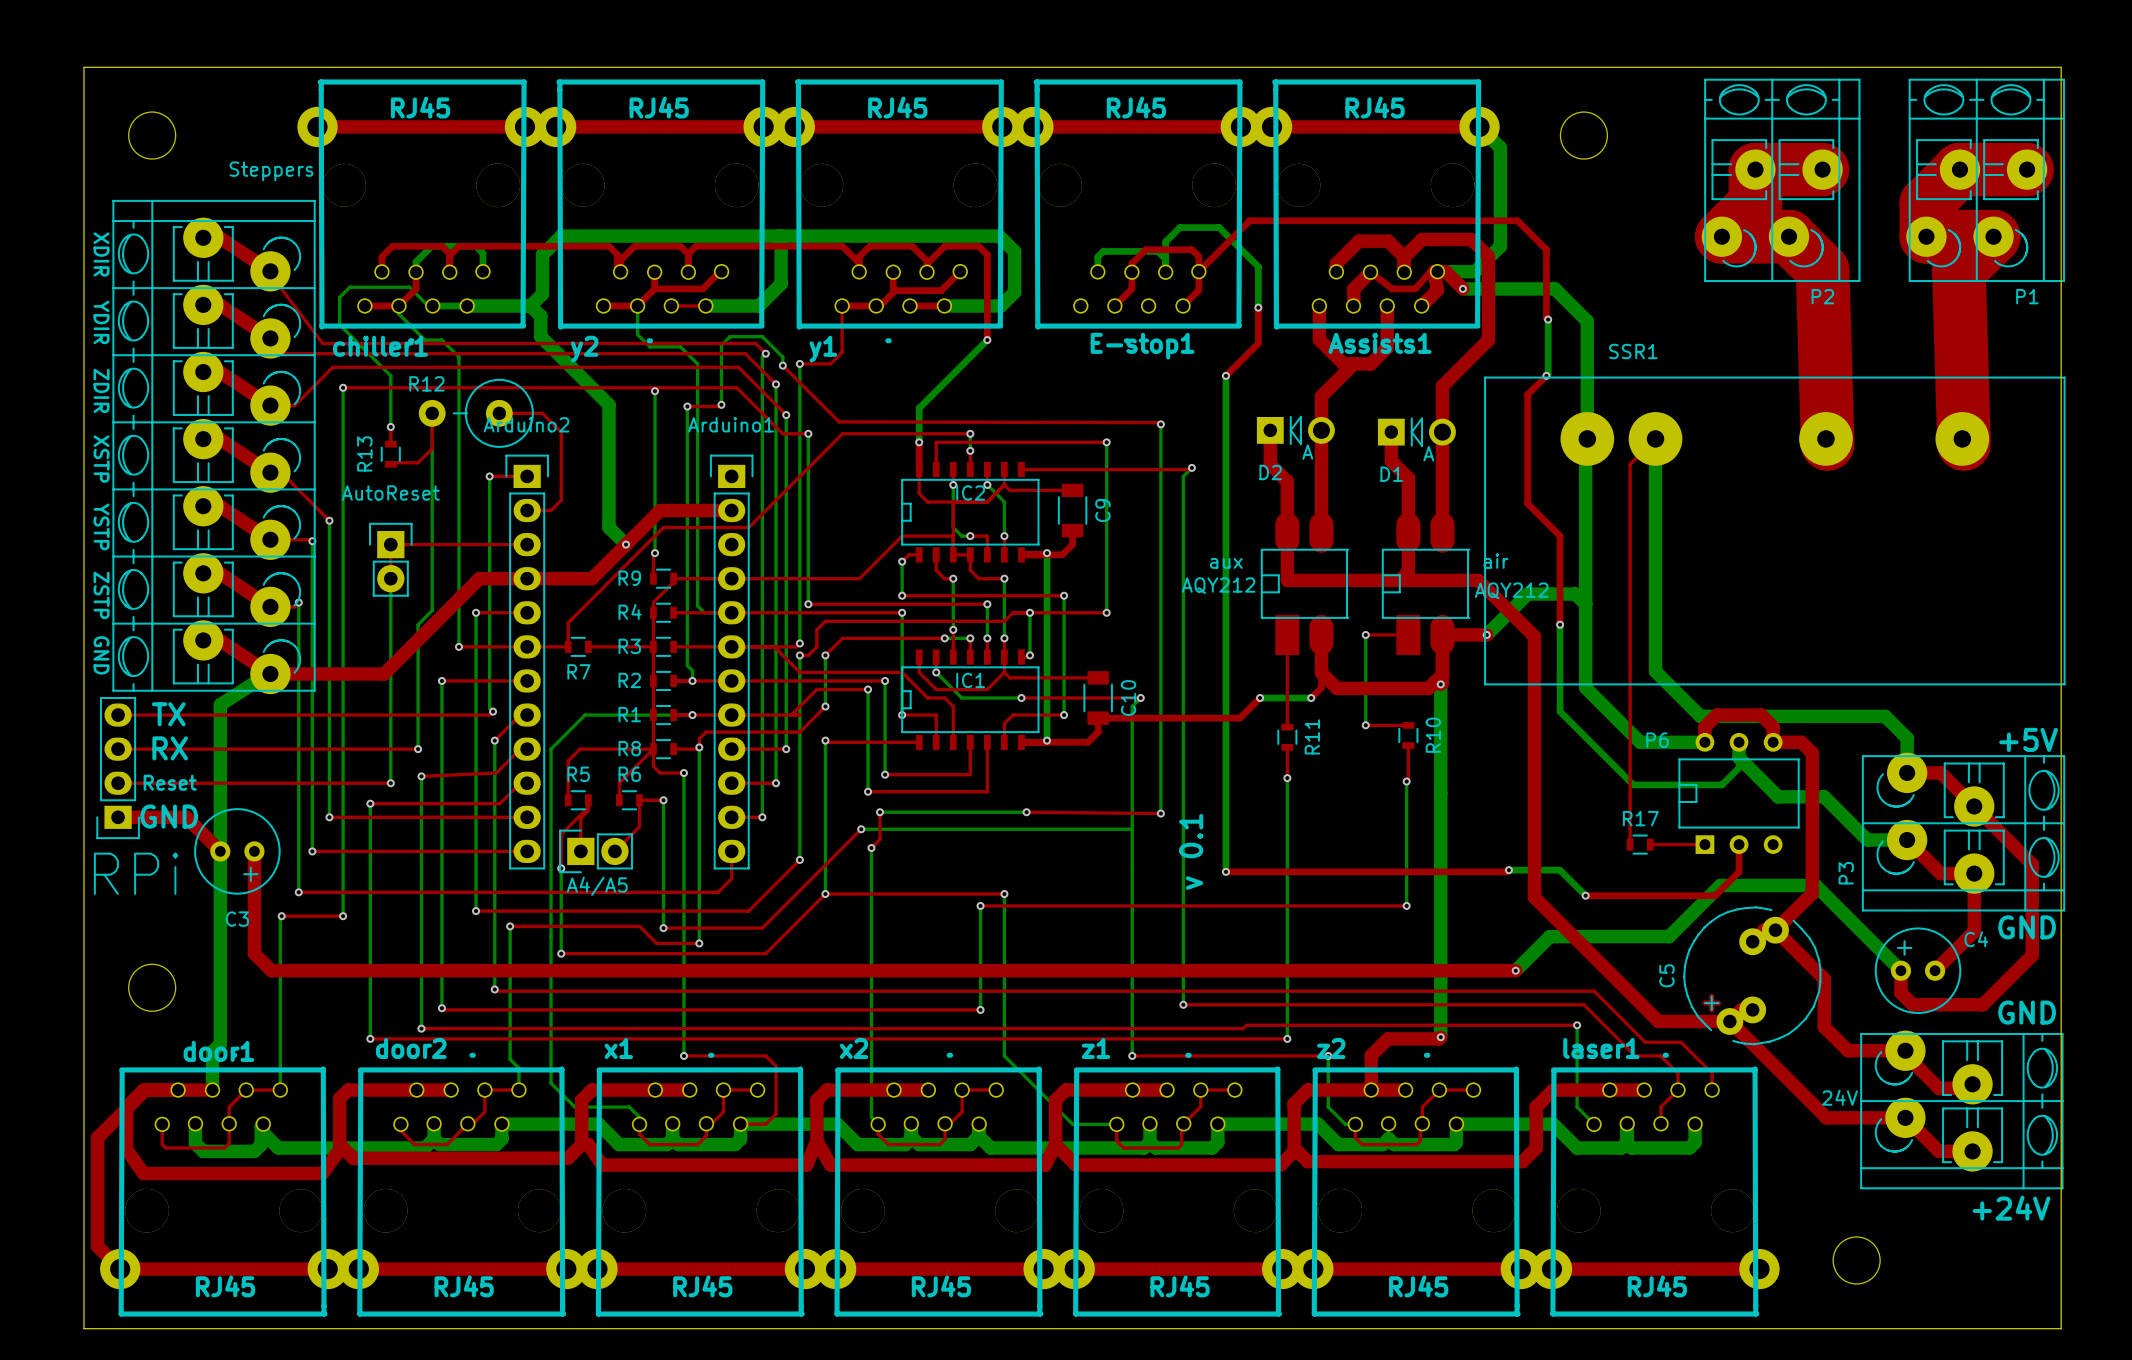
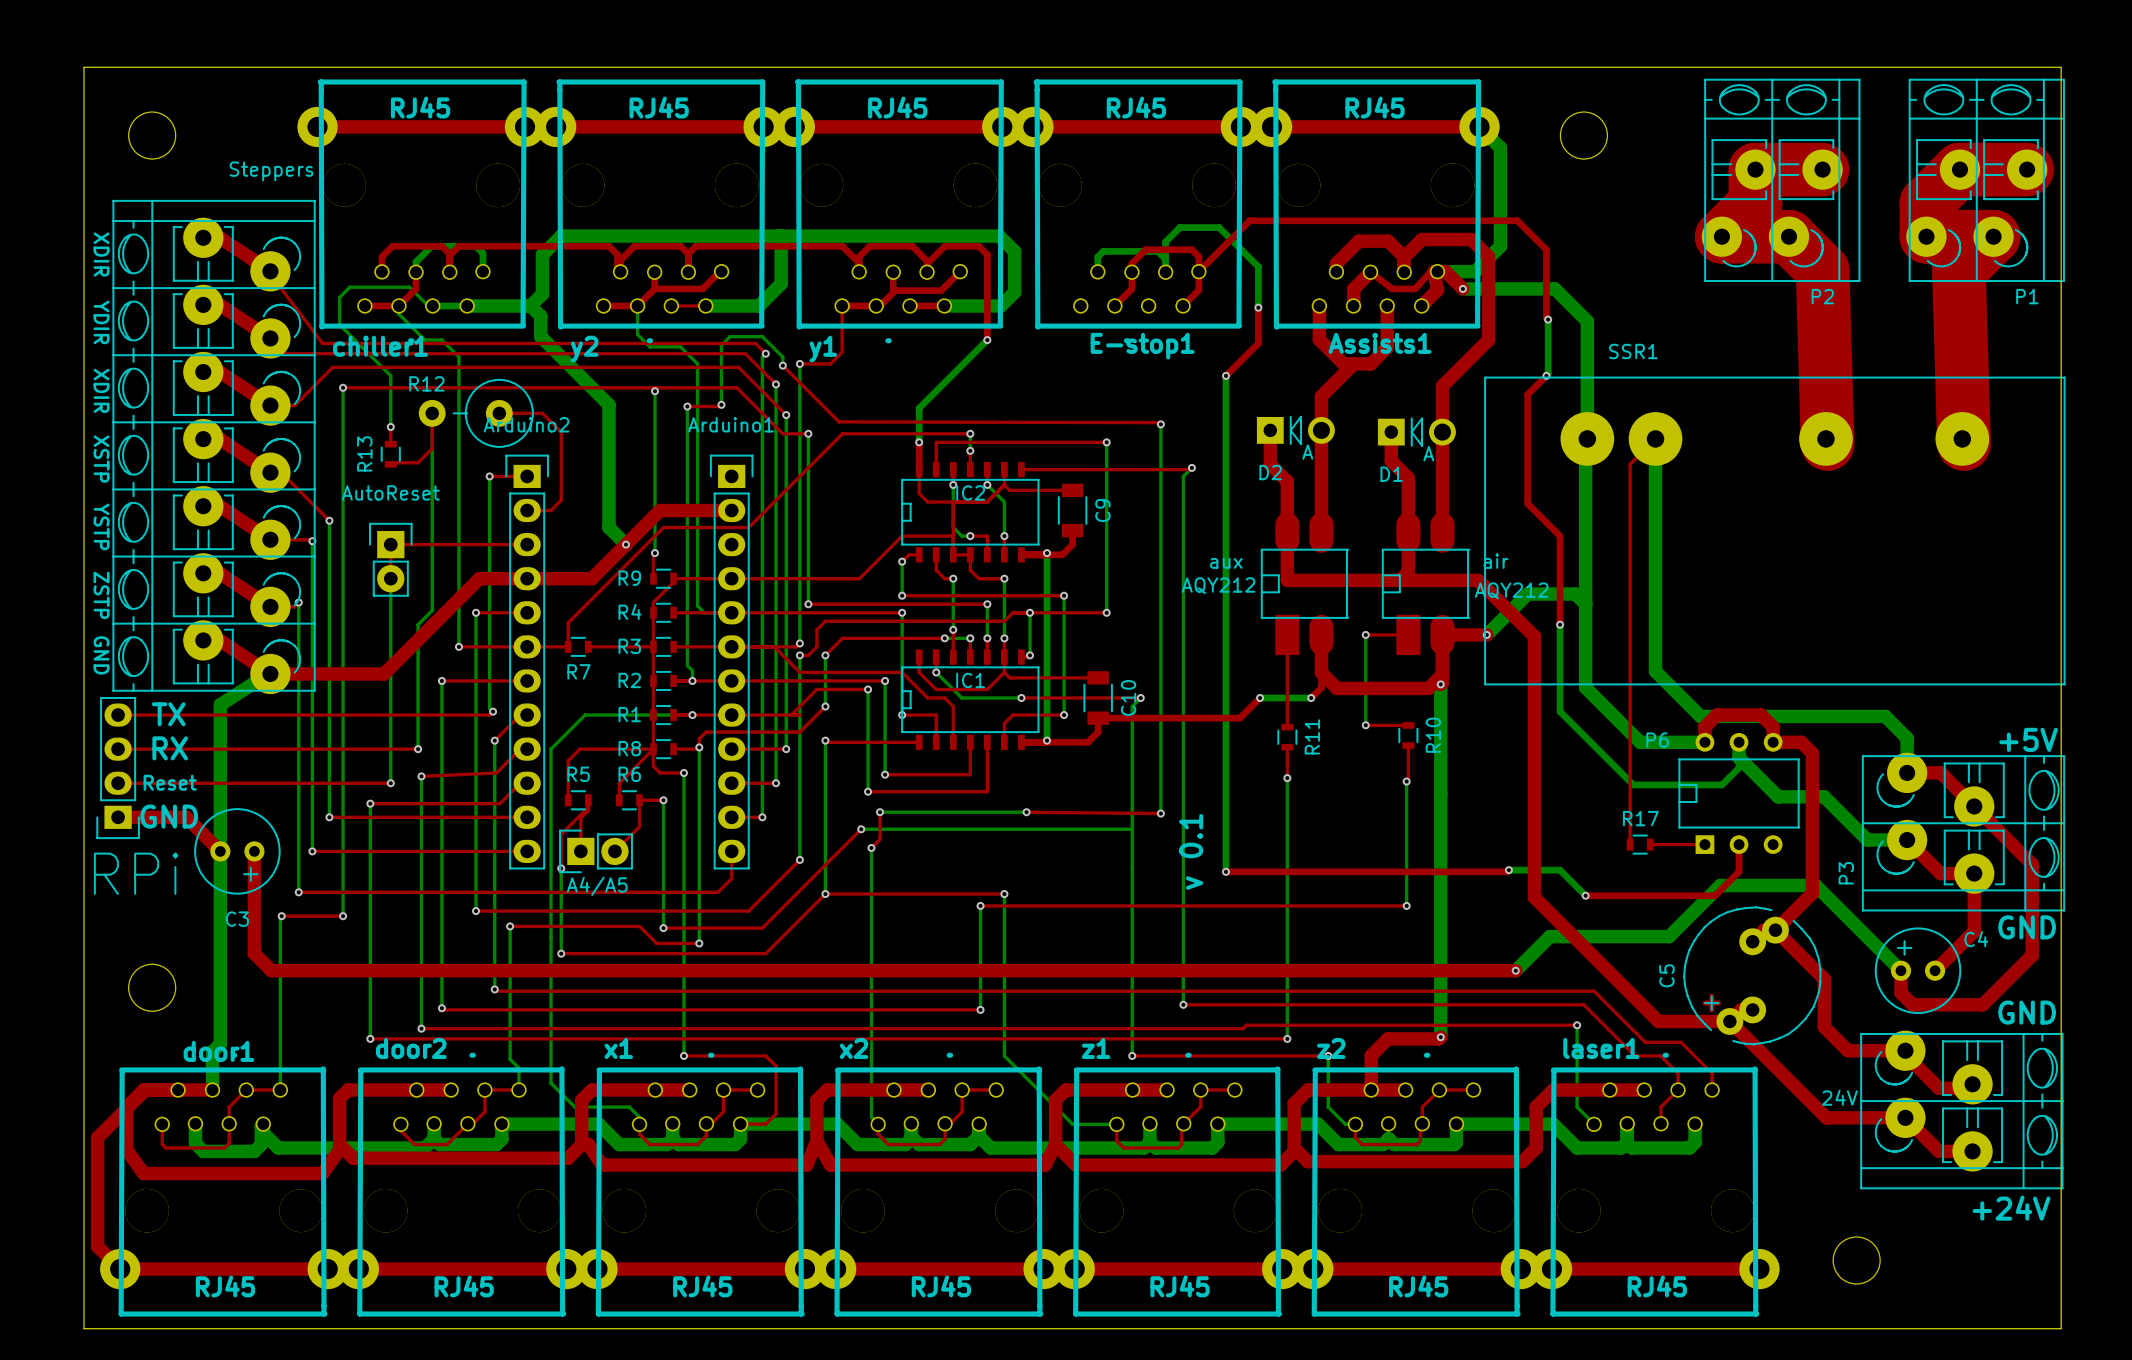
text: ZDIR (101, 390) -> XDIR (101, 390)

